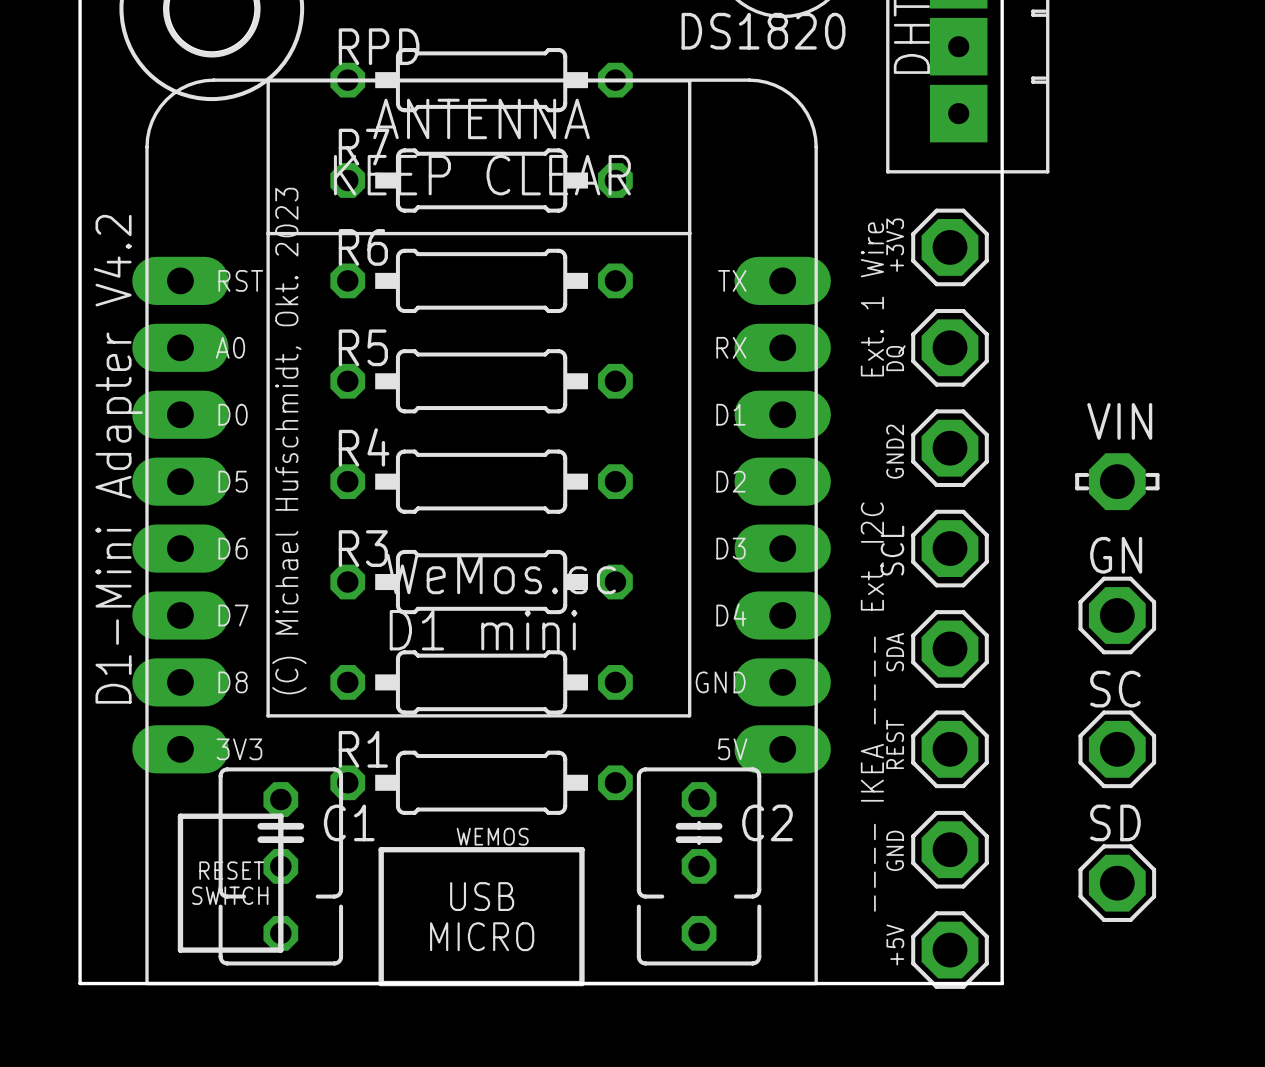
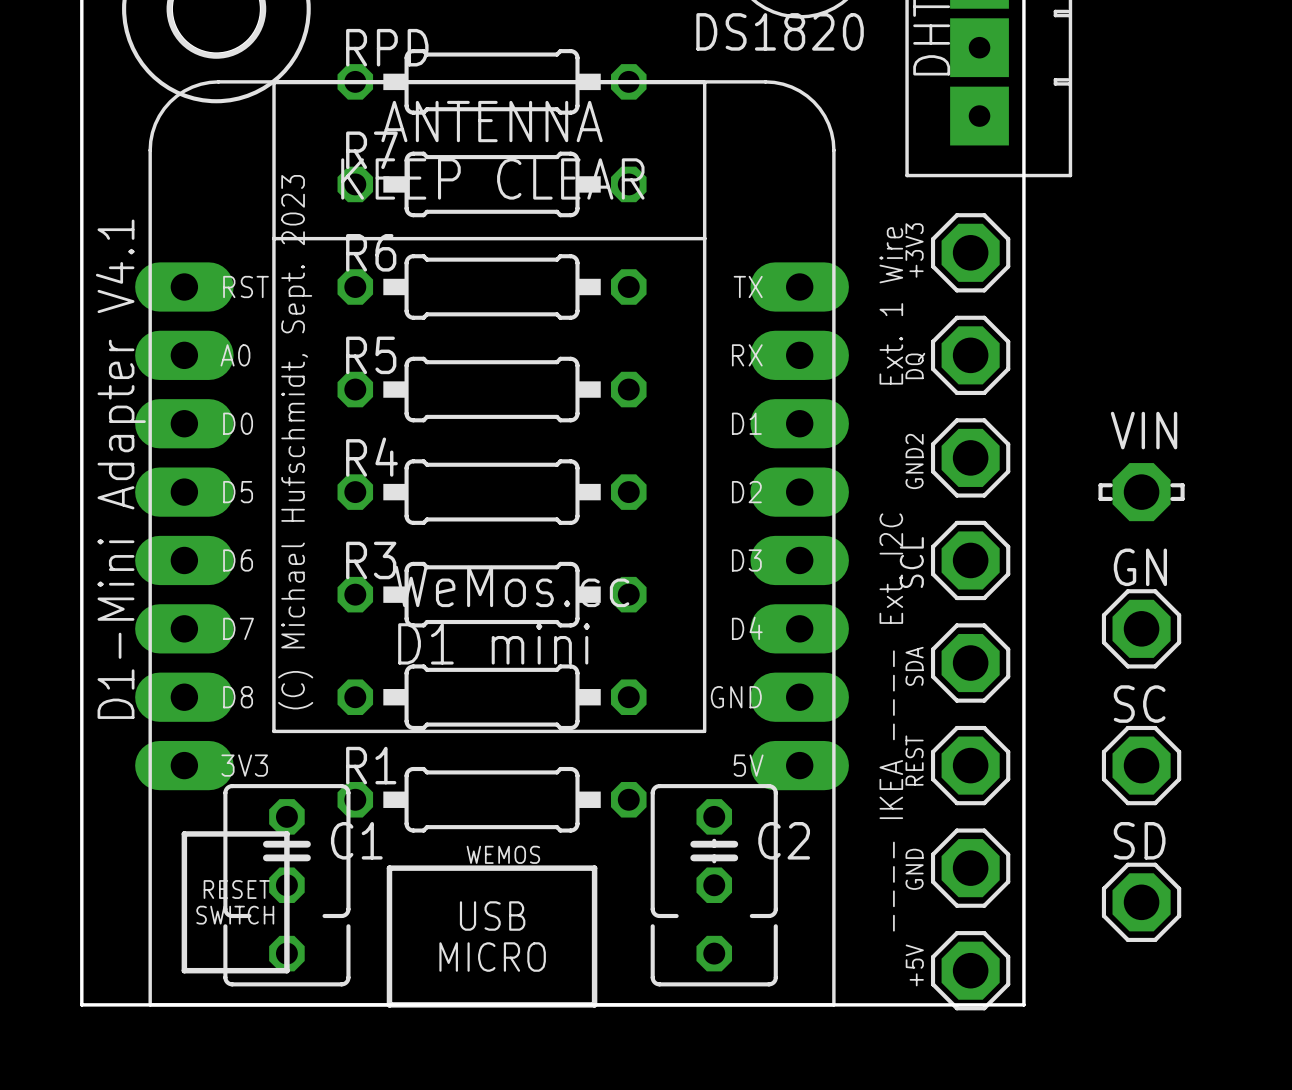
text: (C) Michael Hufschmidt, Okt. 2023 (289, 441) -> (C) Michael Hufschmidt, Sept. 2023 (295, 442)
text: D1-Mini Adapter V4.2 (118, 459) -> D1-Mini Adapter V4.1 (120, 469)

